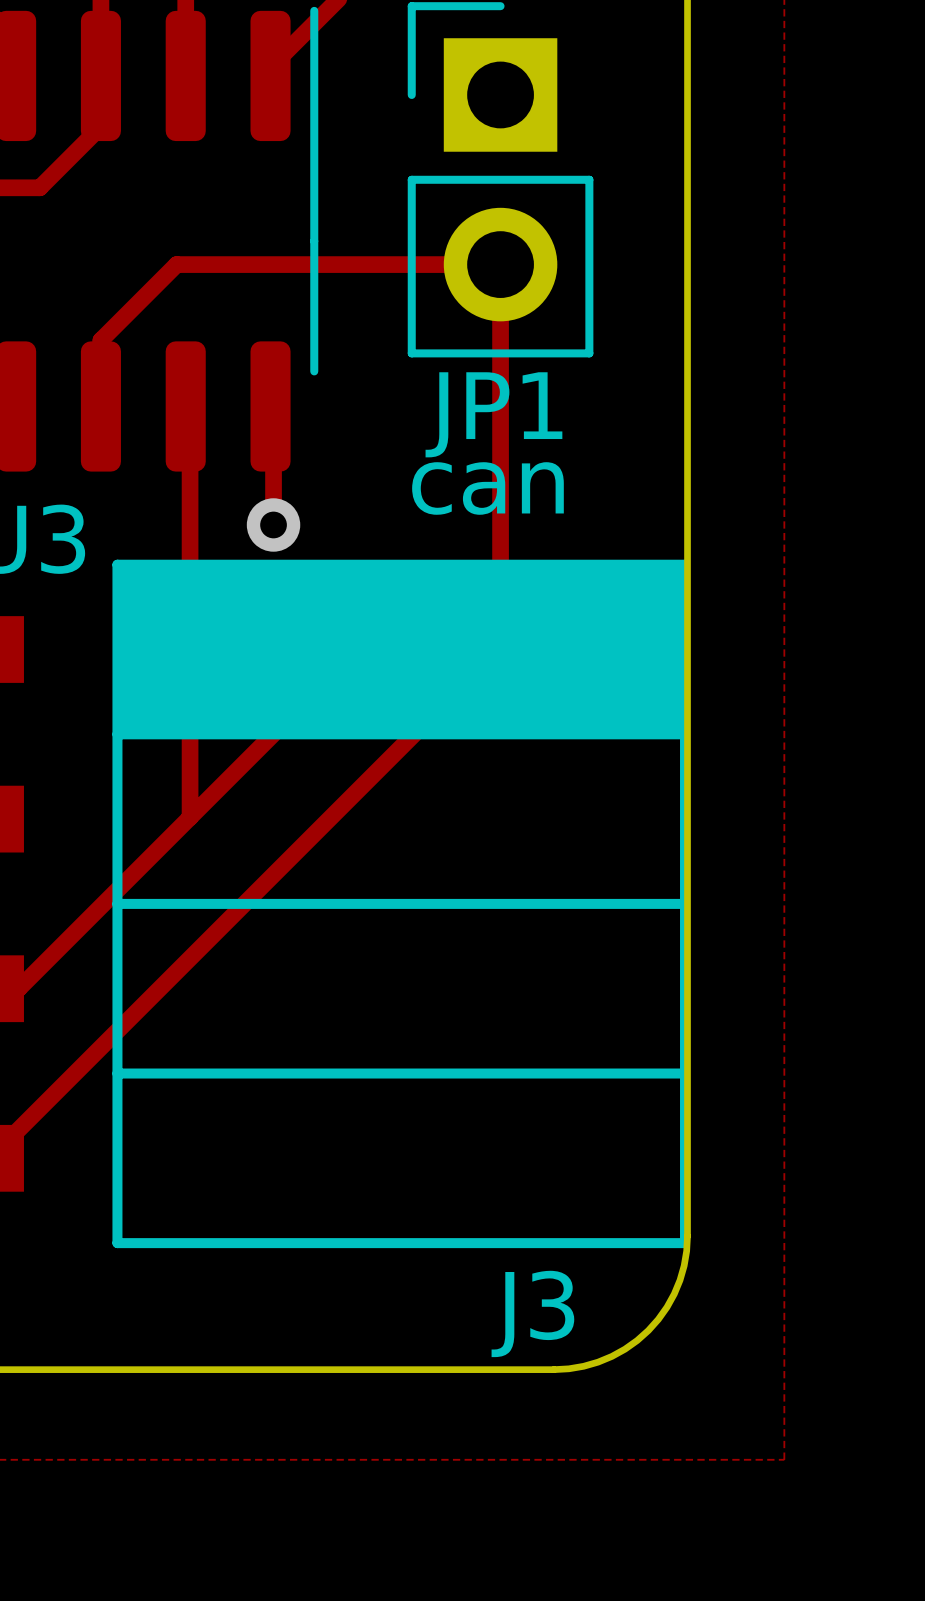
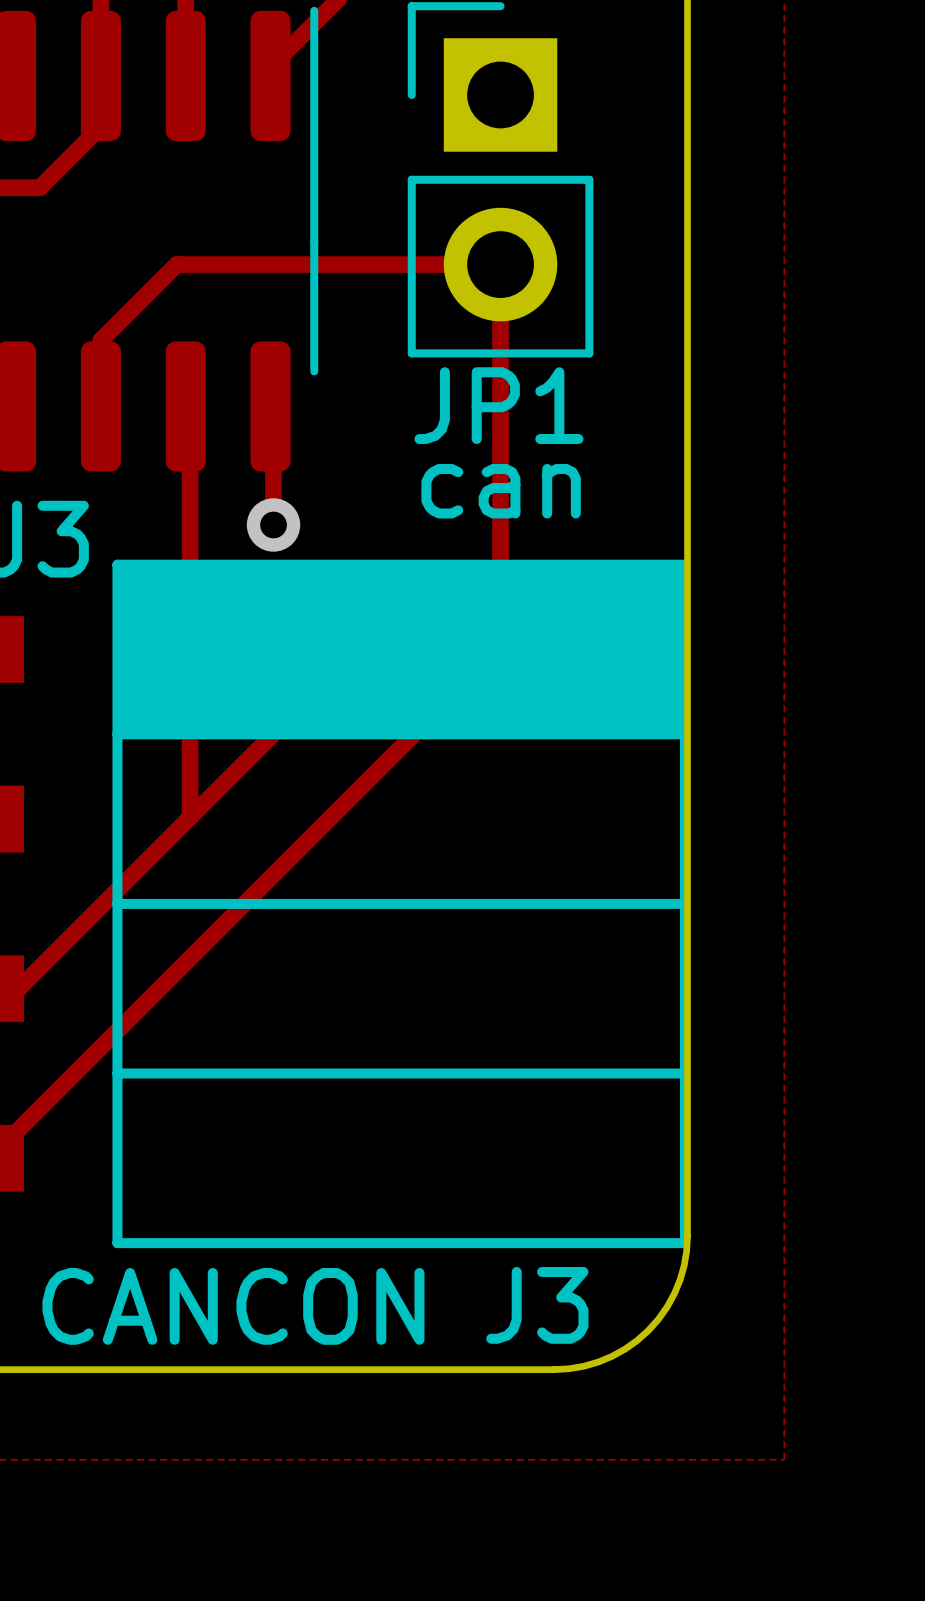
text: none -> CANCON (233, 1306)

